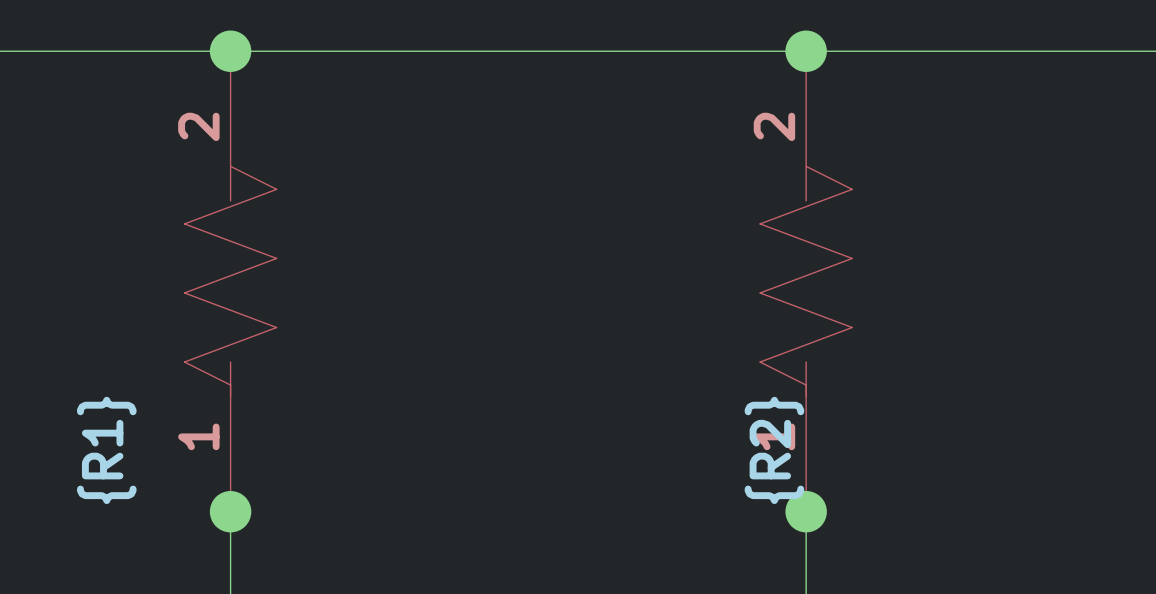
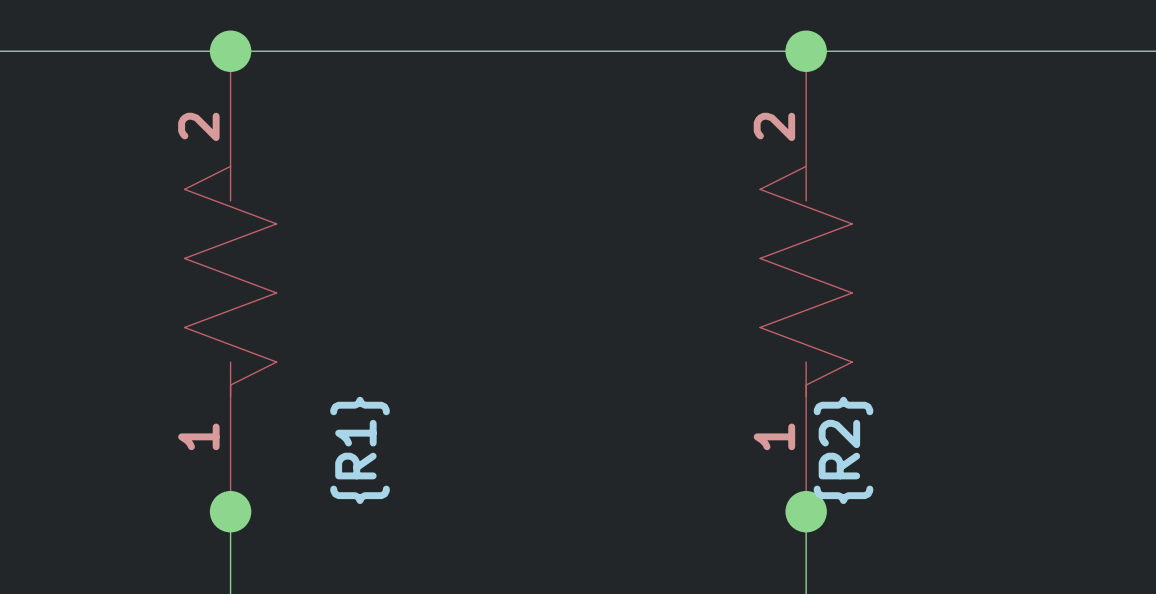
part flip: as is (230, 281) -> left-right (230, 281)
part flip: as is (806, 281) -> left-right (806, 281)

